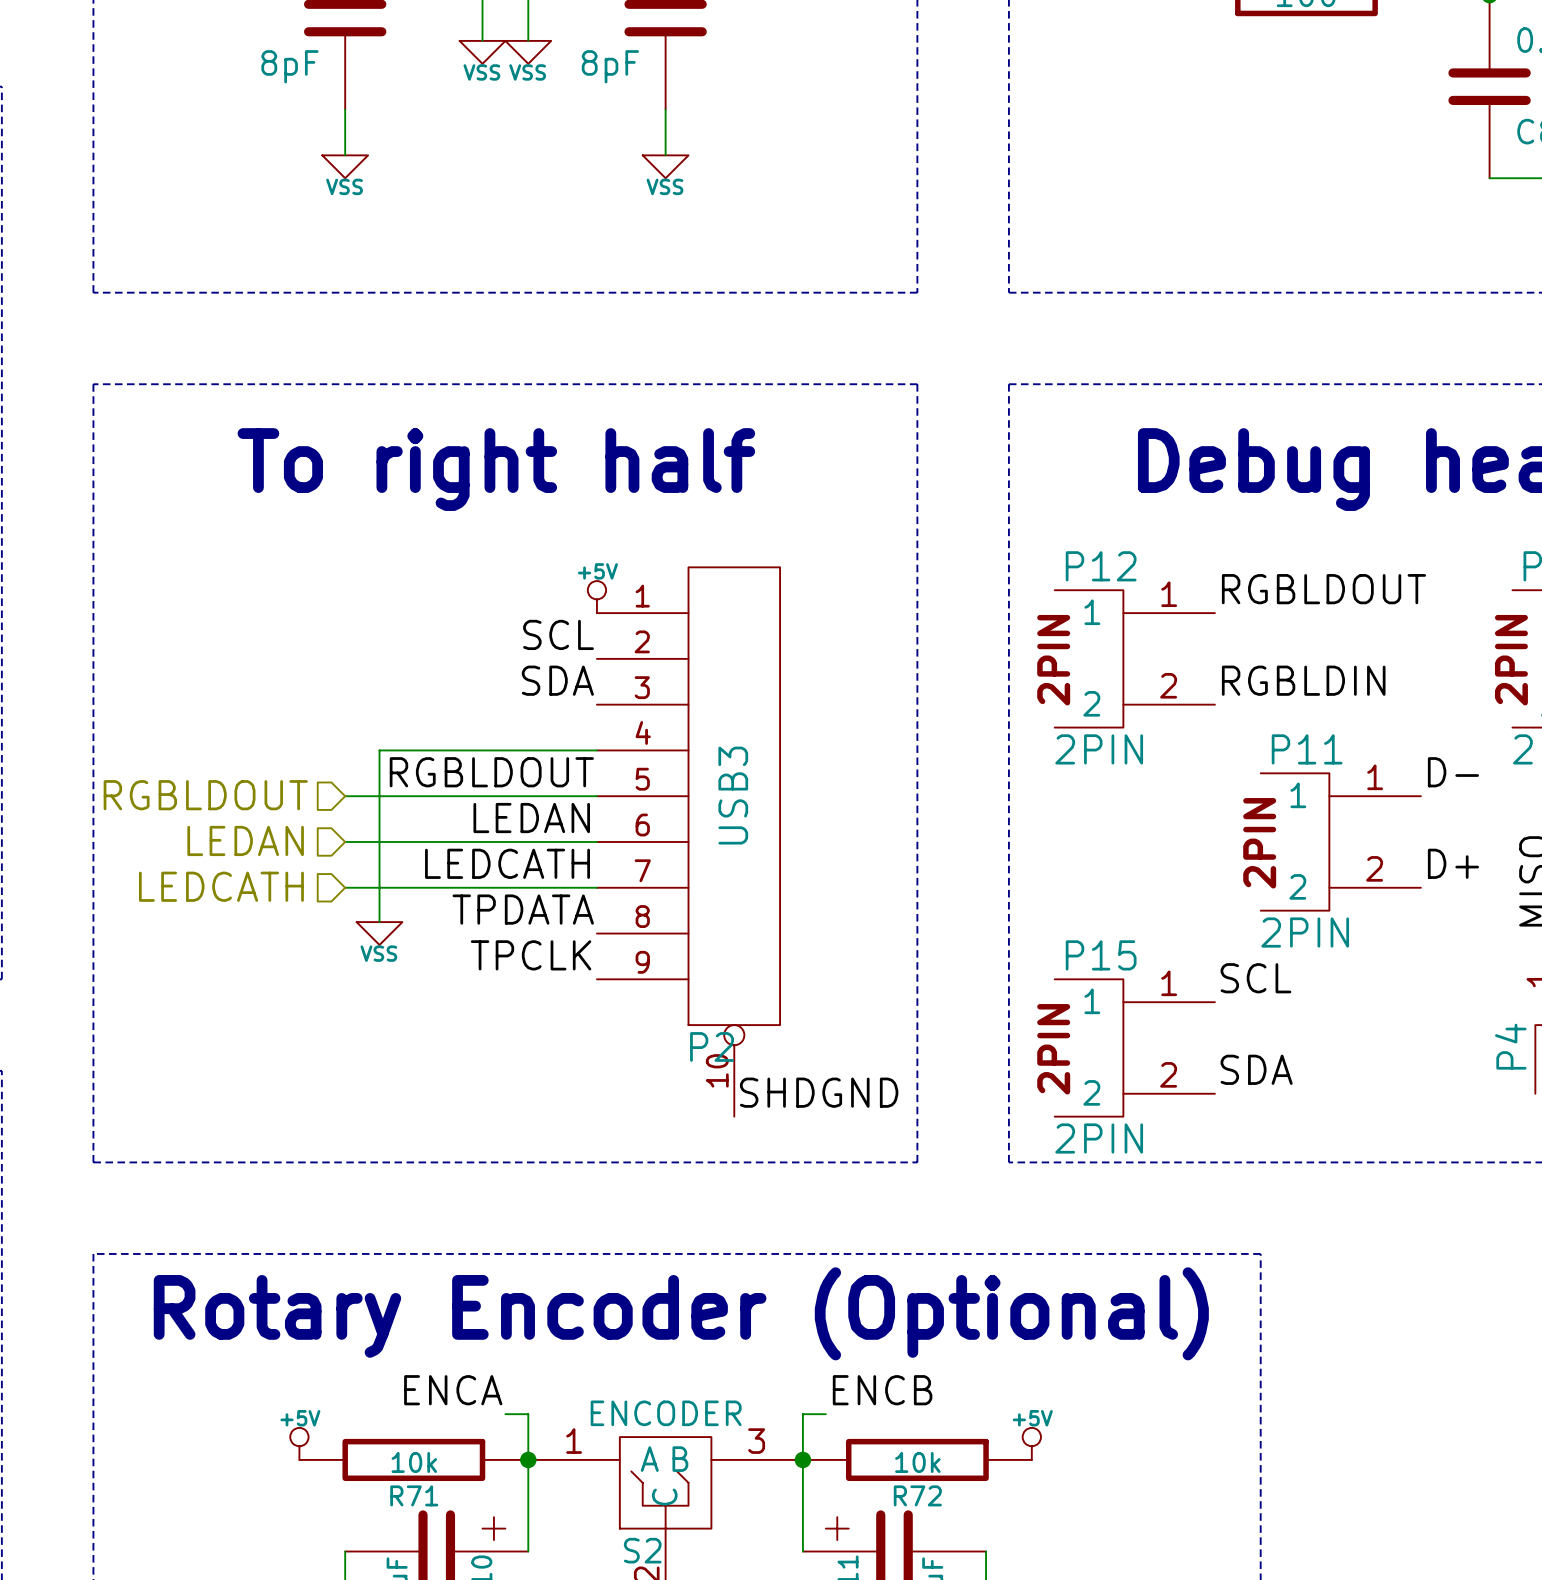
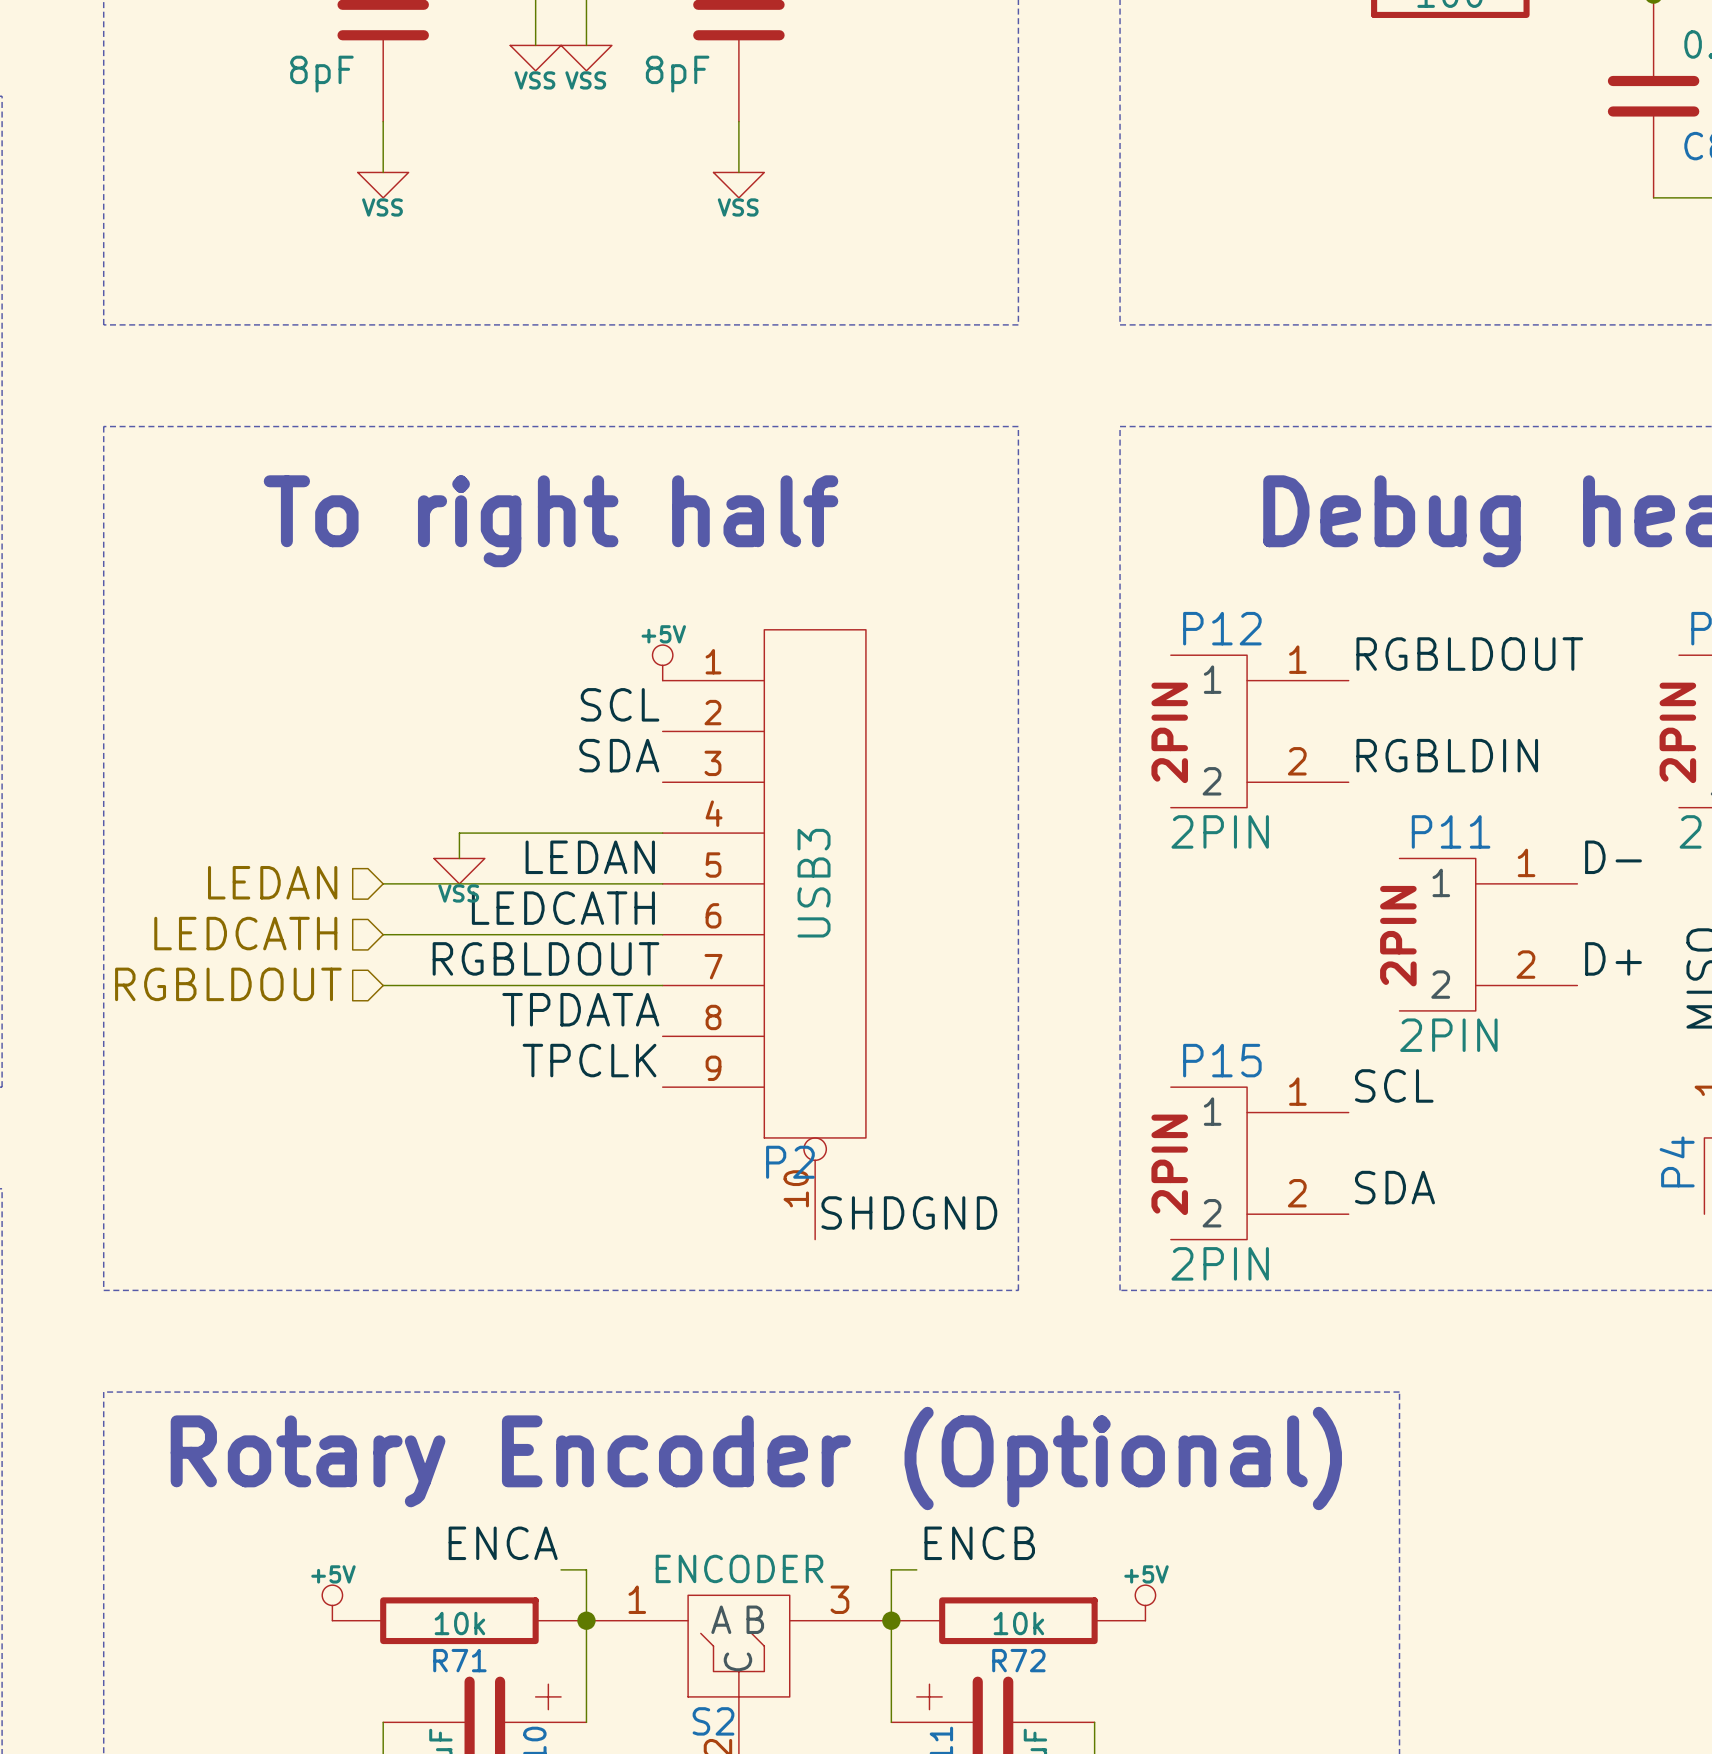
wire: (413, 750) (379, 750) (379, 922) -> (459, 833) (459, 858)
label: RGBLDOUT (491, 772) -> LEDAN (590, 857)
hierarchical label: RGBLDOUT (205, 795) -> LEDAN (272, 882)
label: LEDAN (531, 818) -> LEDCATH (563, 908)
hierarchical label: LEDAN (245, 840) -> LEDCATH (245, 933)
label: LEDCATH (507, 863) -> RGBLDOUT (545, 958)
hierarchical label: LEDCATH (221, 886) -> RGBLDOUT (228, 984)
power symbol position: VSS (379, 933) -> VSS (459, 871)

